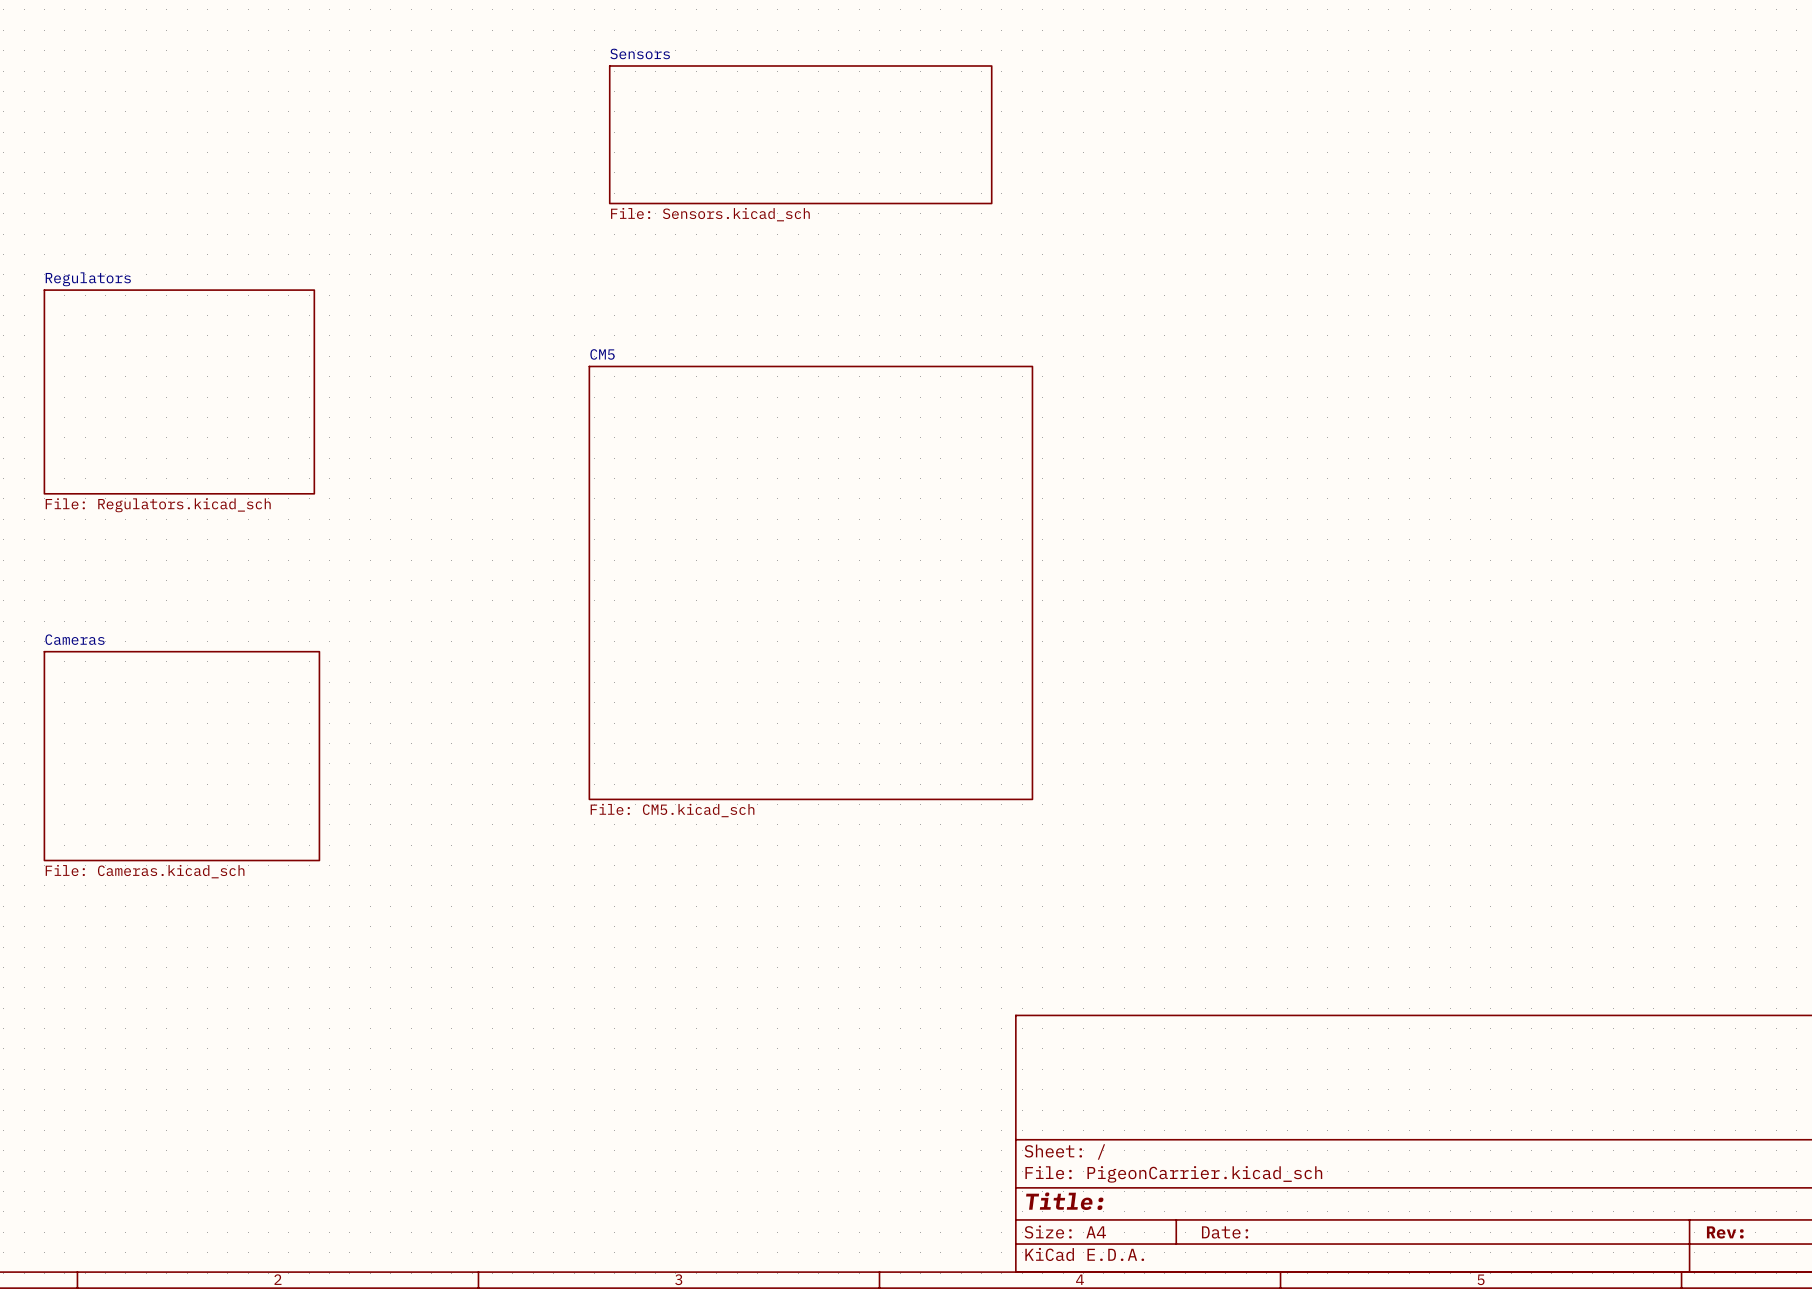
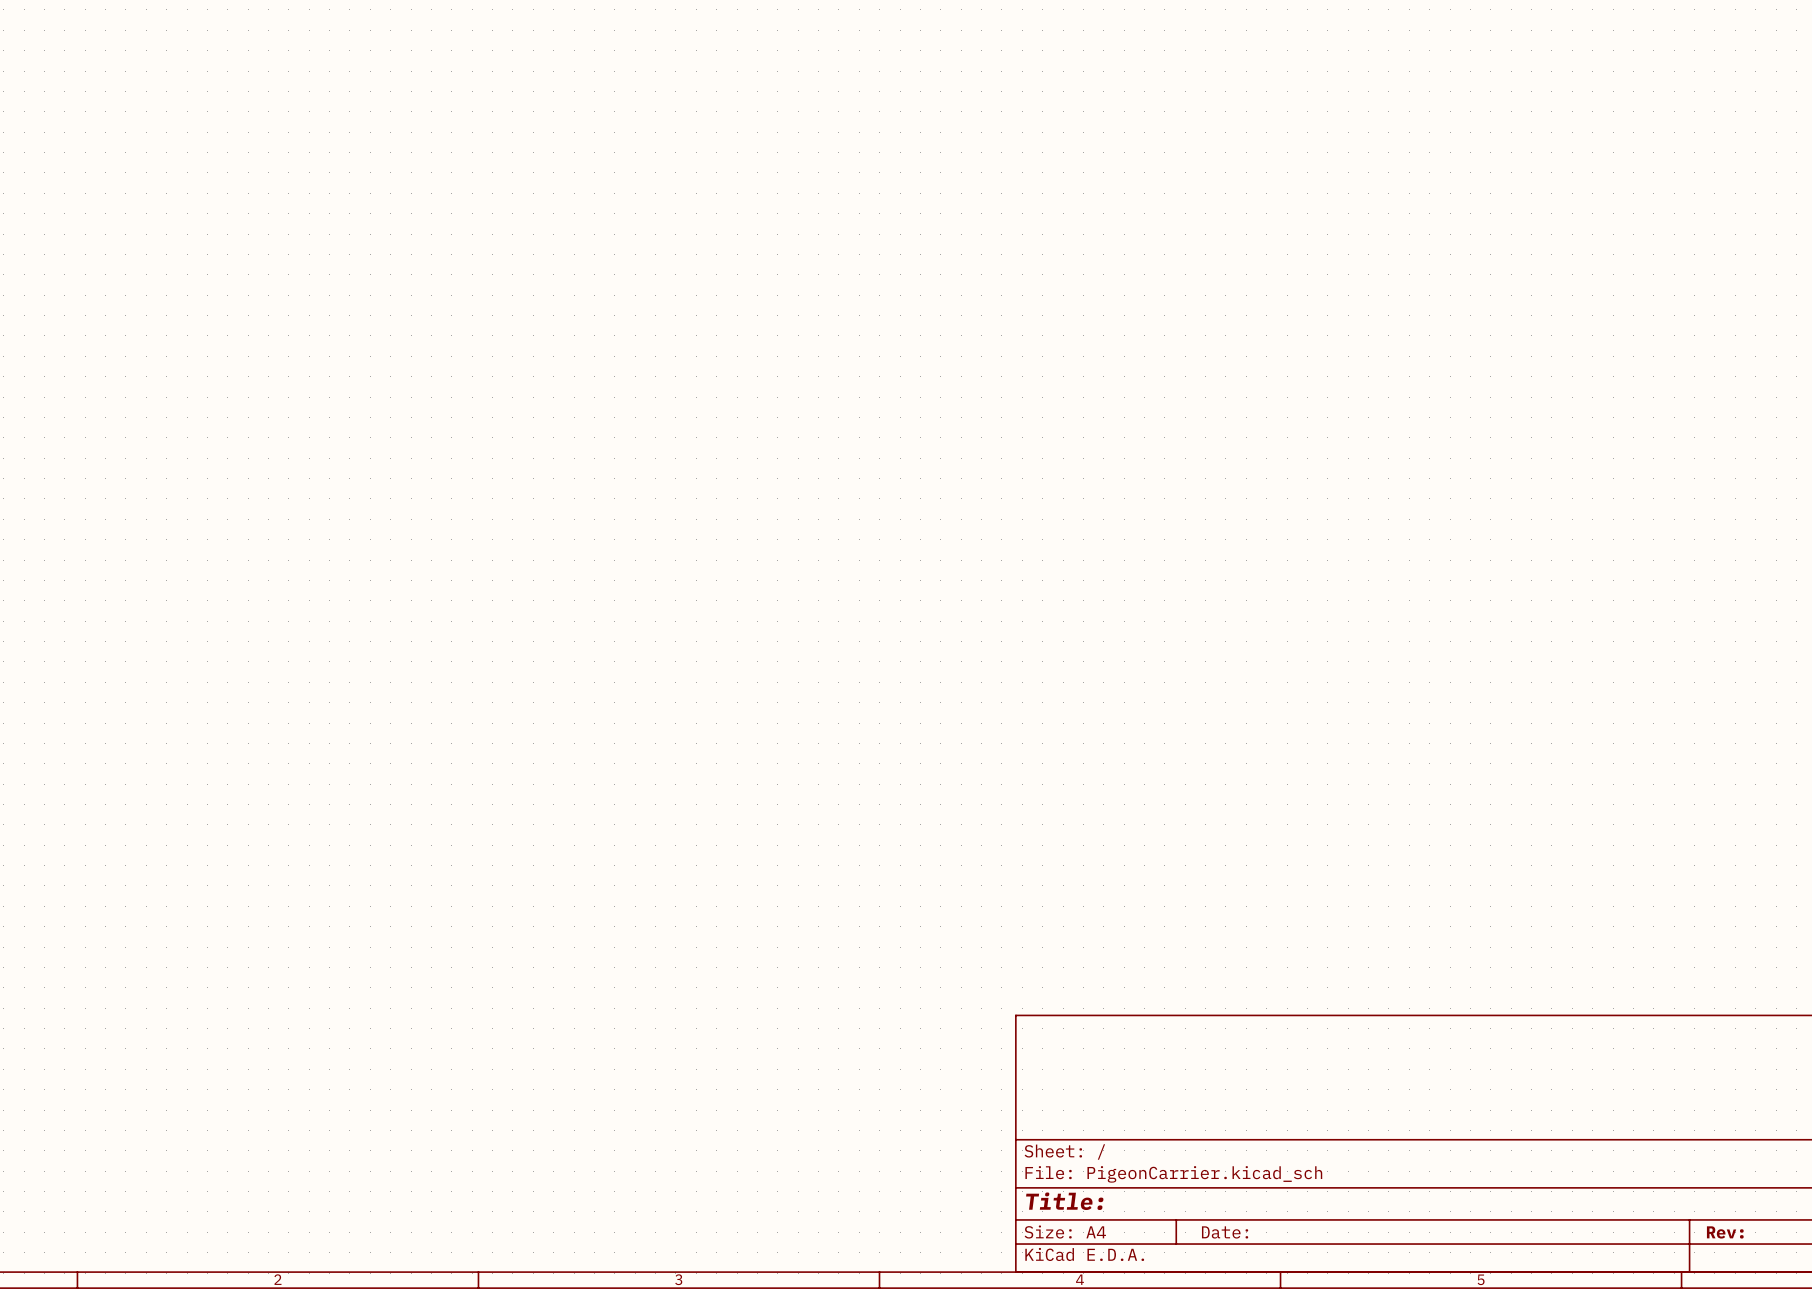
sheet Sensors: File: Sensors.kicad_sch (800, 134) -> none
sheet Regulators: File: Regulators.kicad_sch (179, 391) -> none
sheet CM5: File: CM5.kicad_sch (810, 582) -> none
sheet Cameras: File: Cameras.kicad_sch (181, 756) -> none

